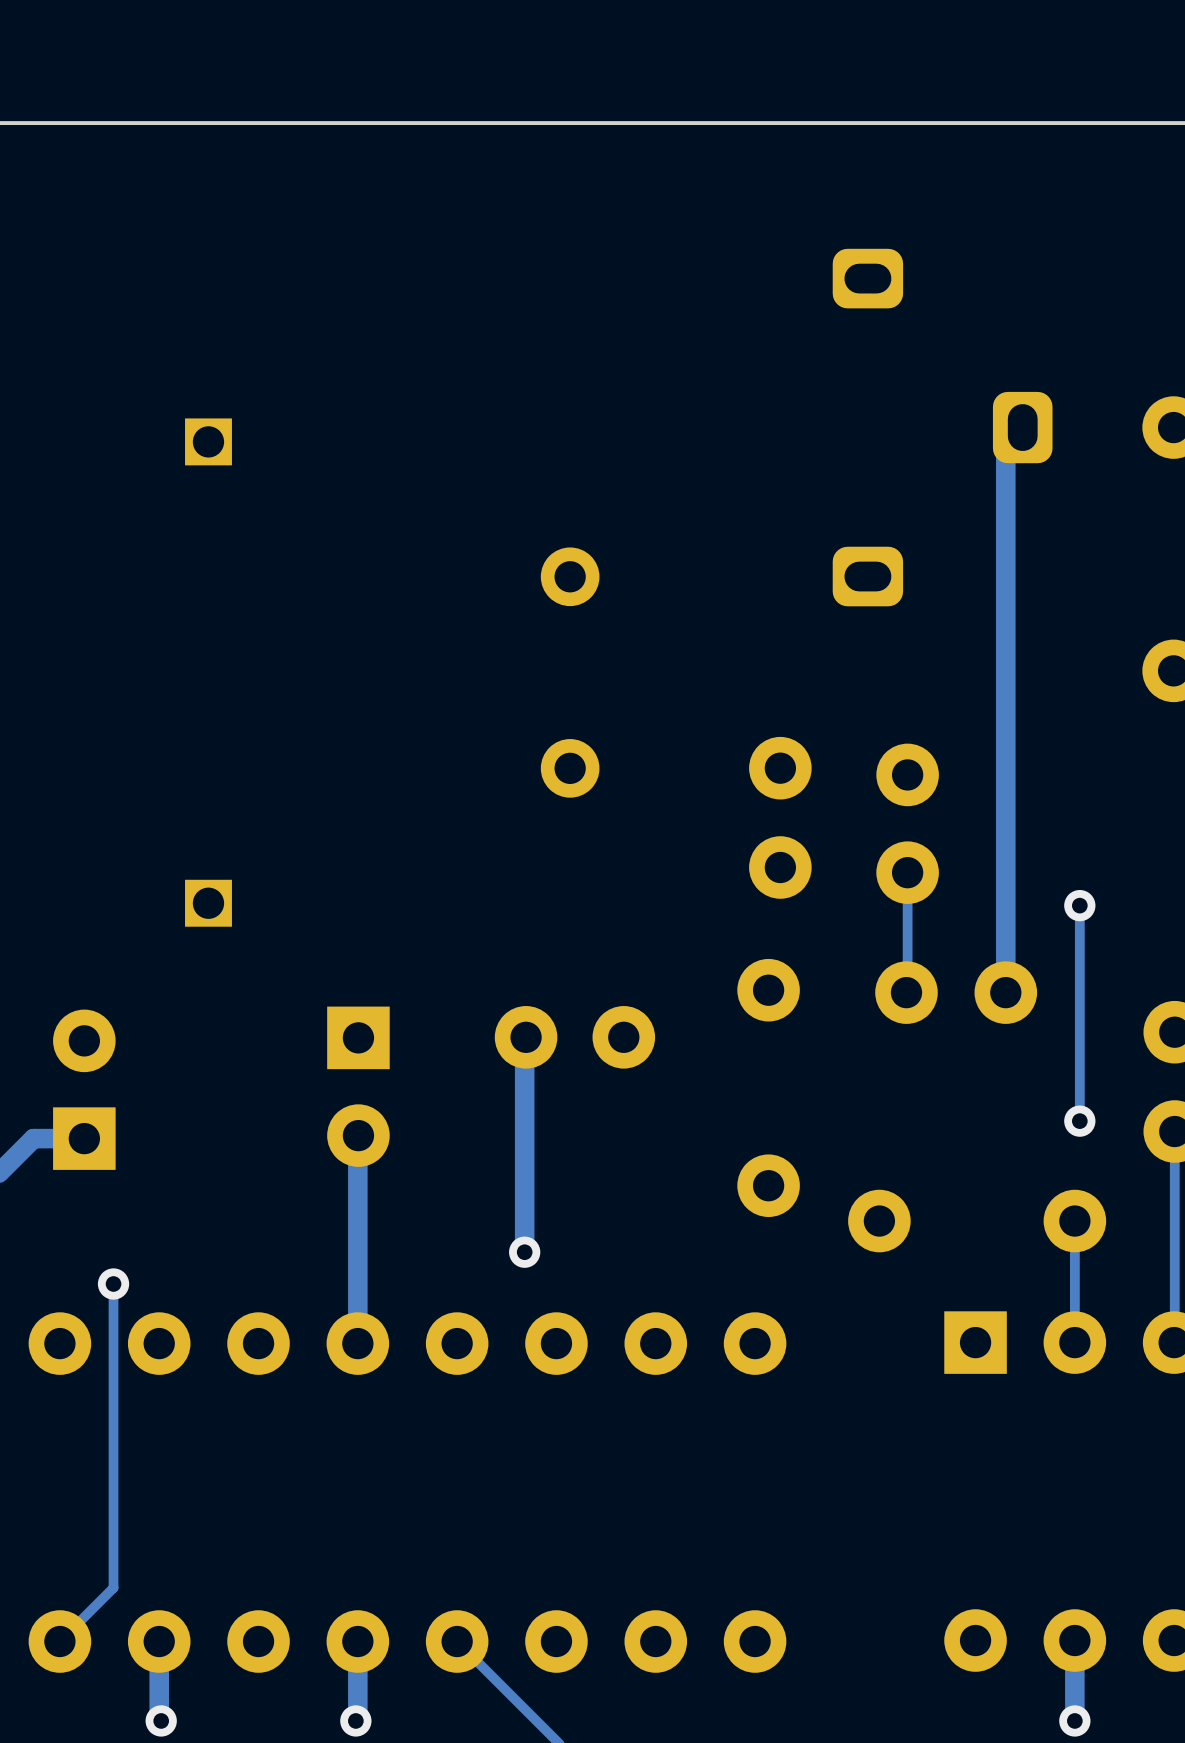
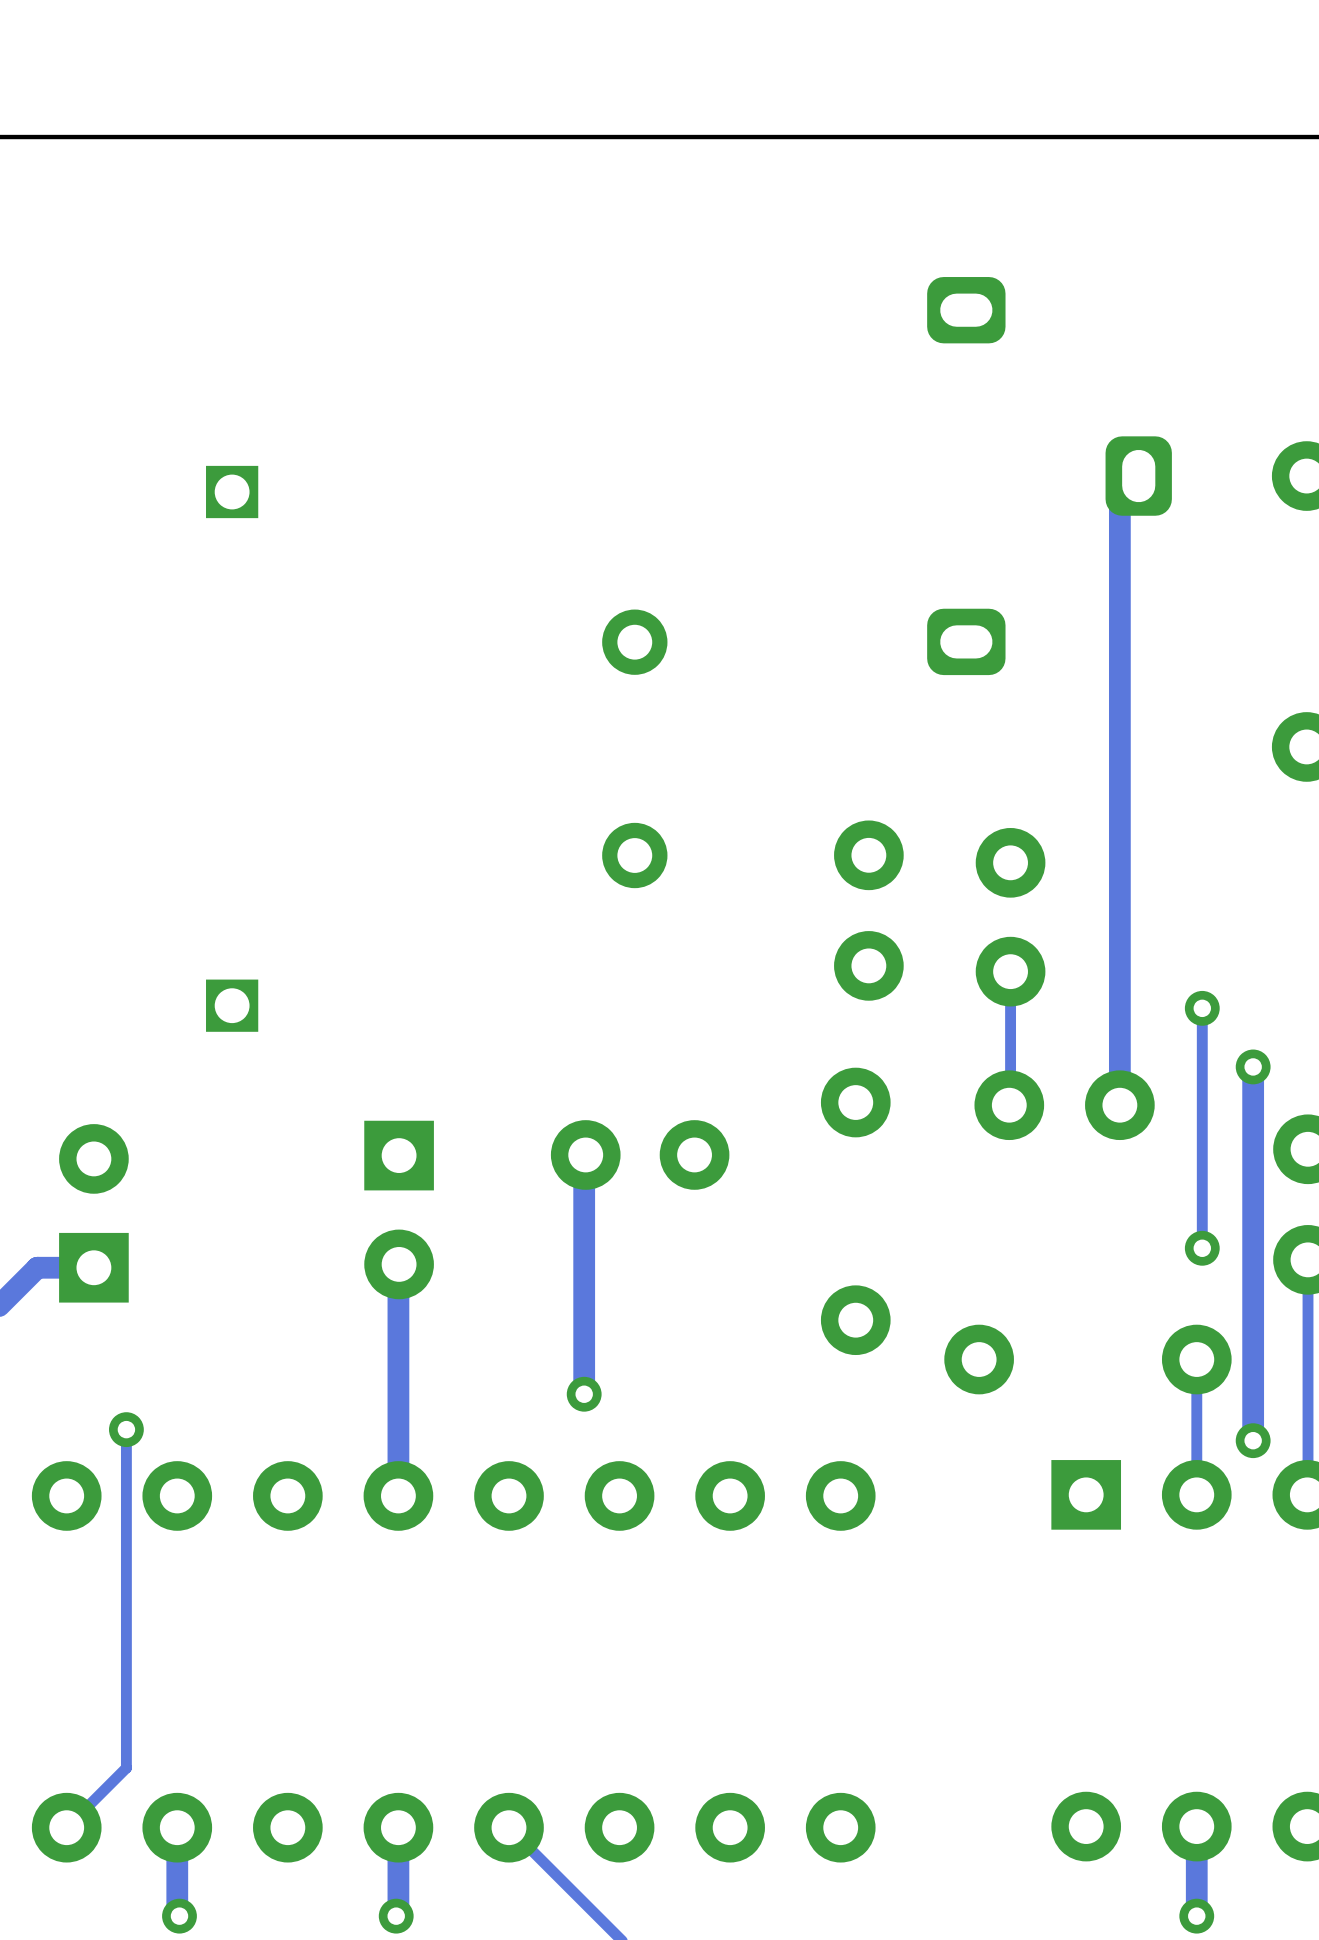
track: none -> (1253, 1066) (1253, 1440)
via: none -> (1253, 1066)
via: none -> (1253, 1440)

